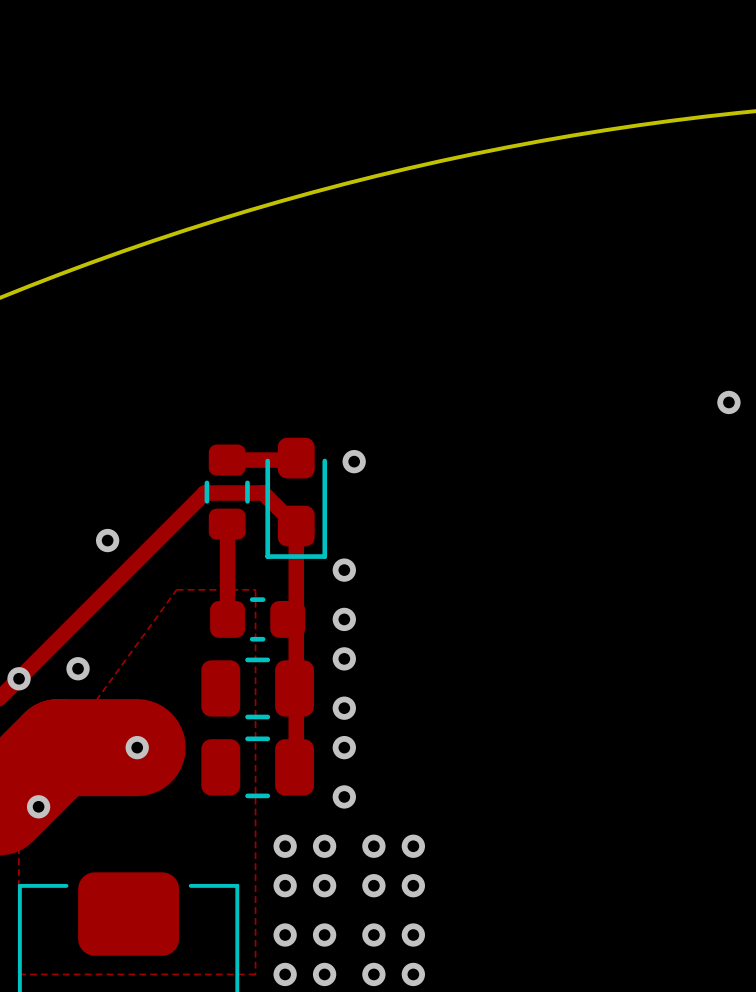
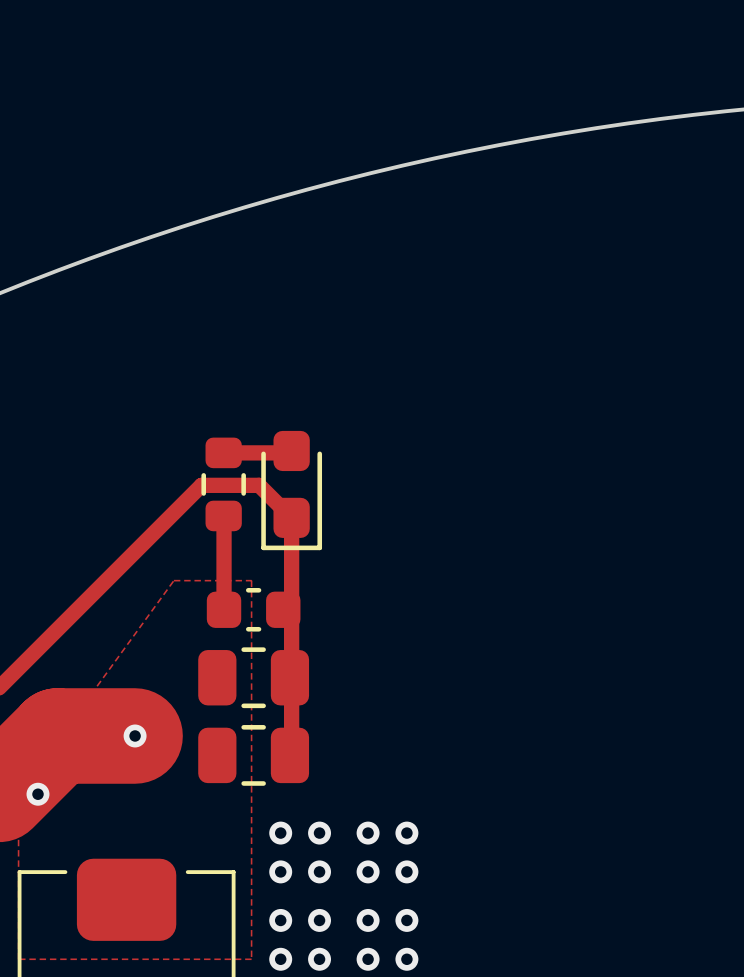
via: (728, 402) -> none
via: (354, 461) -> none
via: (107, 540) -> none
via: (344, 570) -> none
via: (344, 619) -> none
via: (344, 658) -> none
via: (78, 668) -> none
via: (19, 678) -> none
via: (344, 708) -> none
via: (344, 747) -> none
via: (344, 796) -> none

